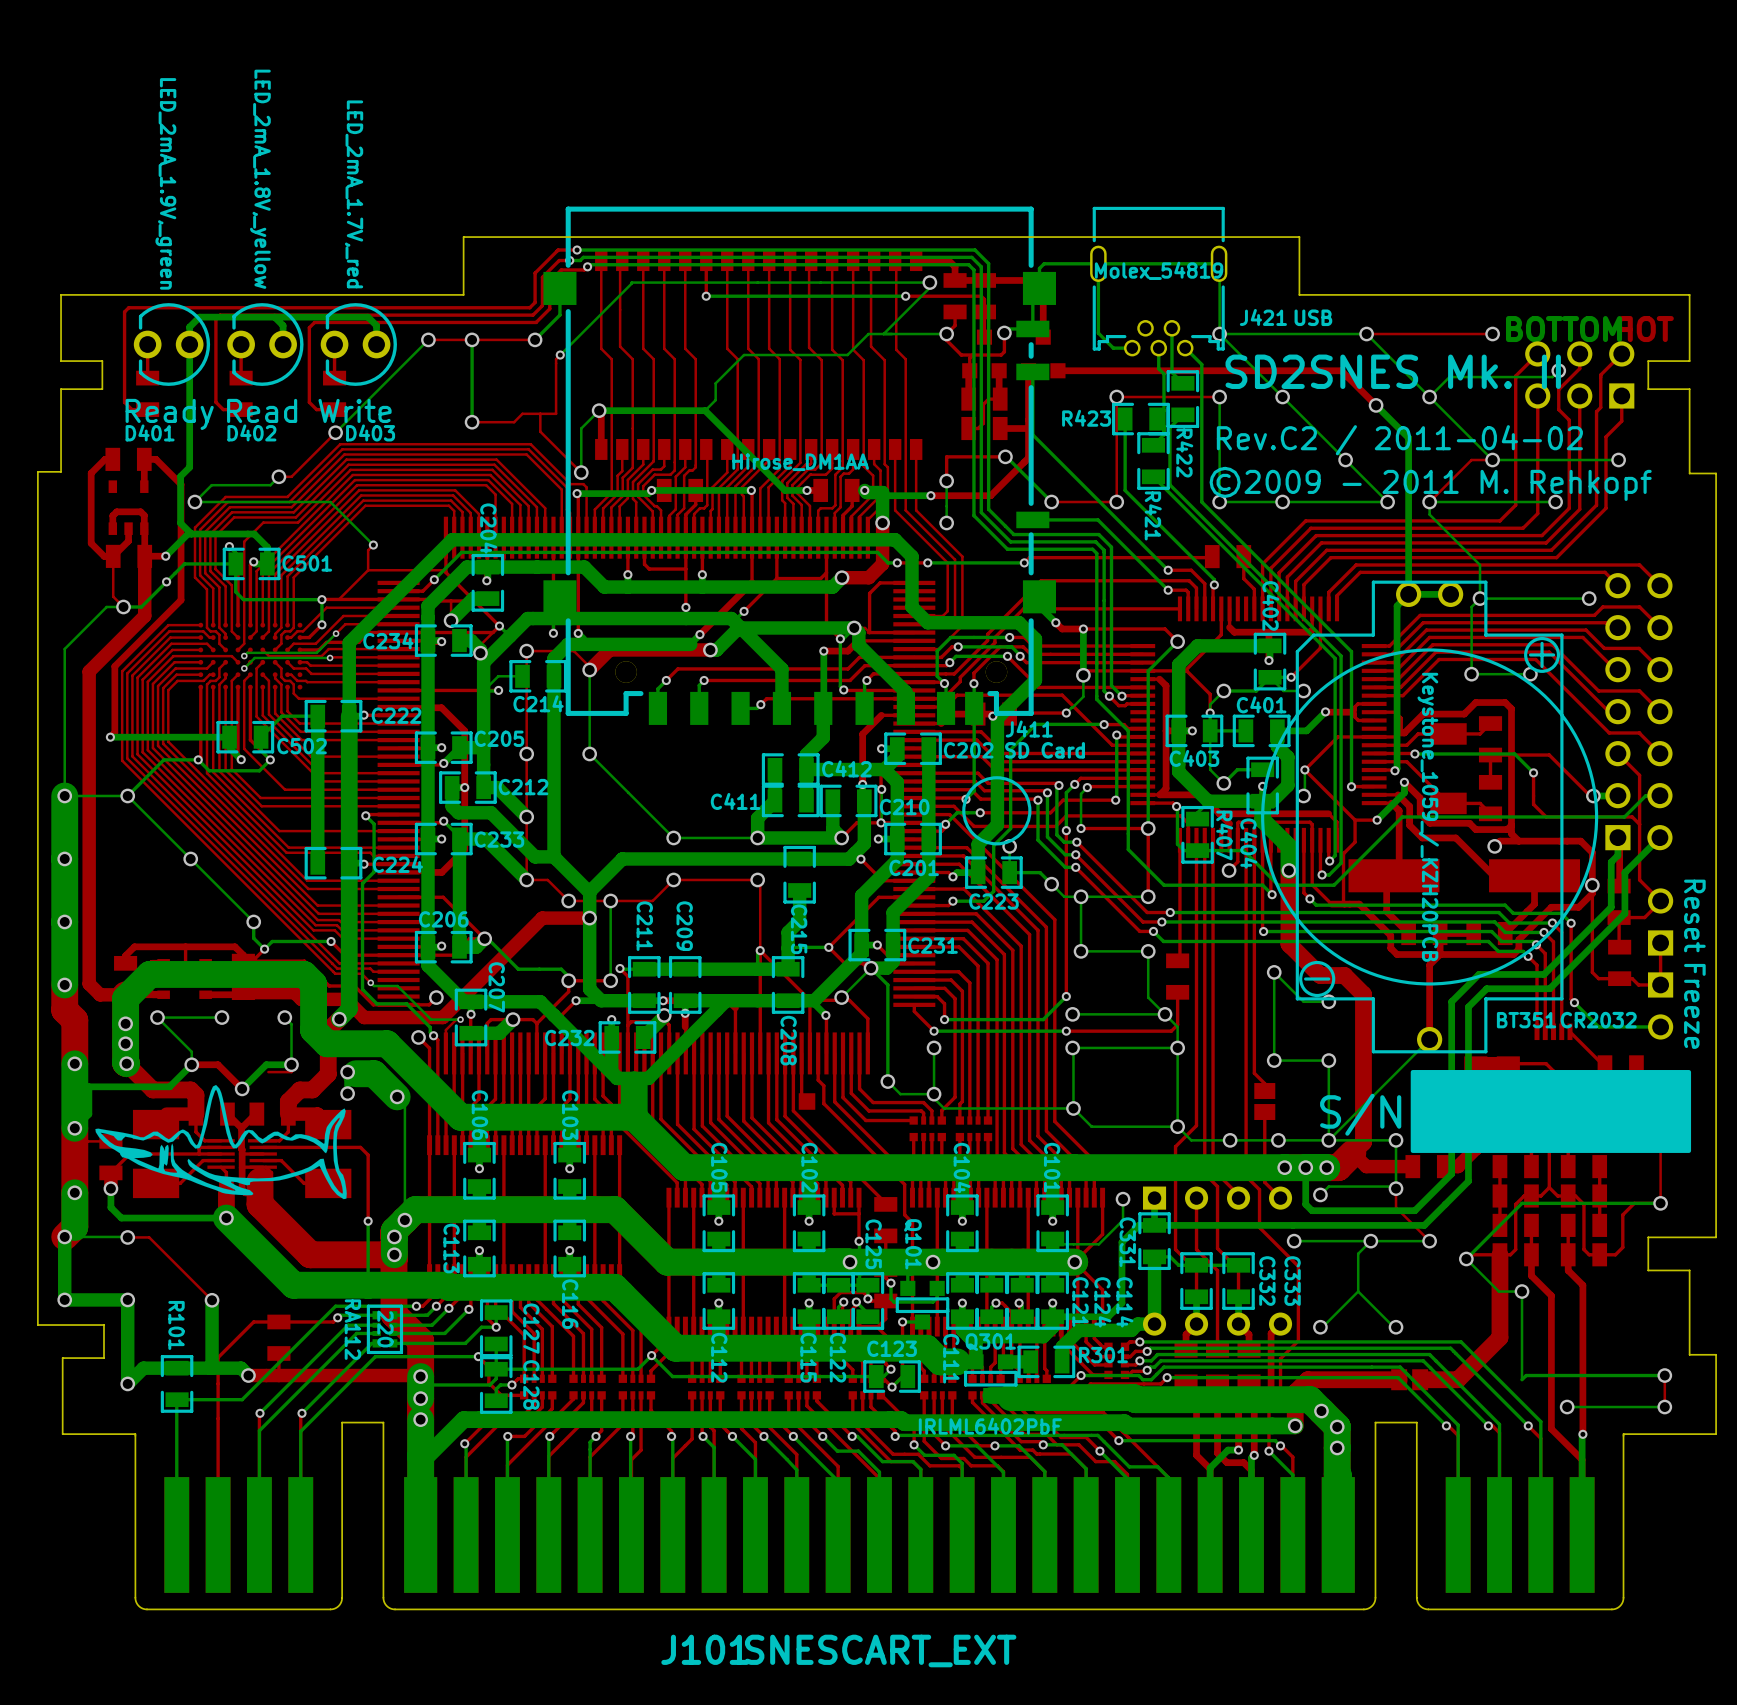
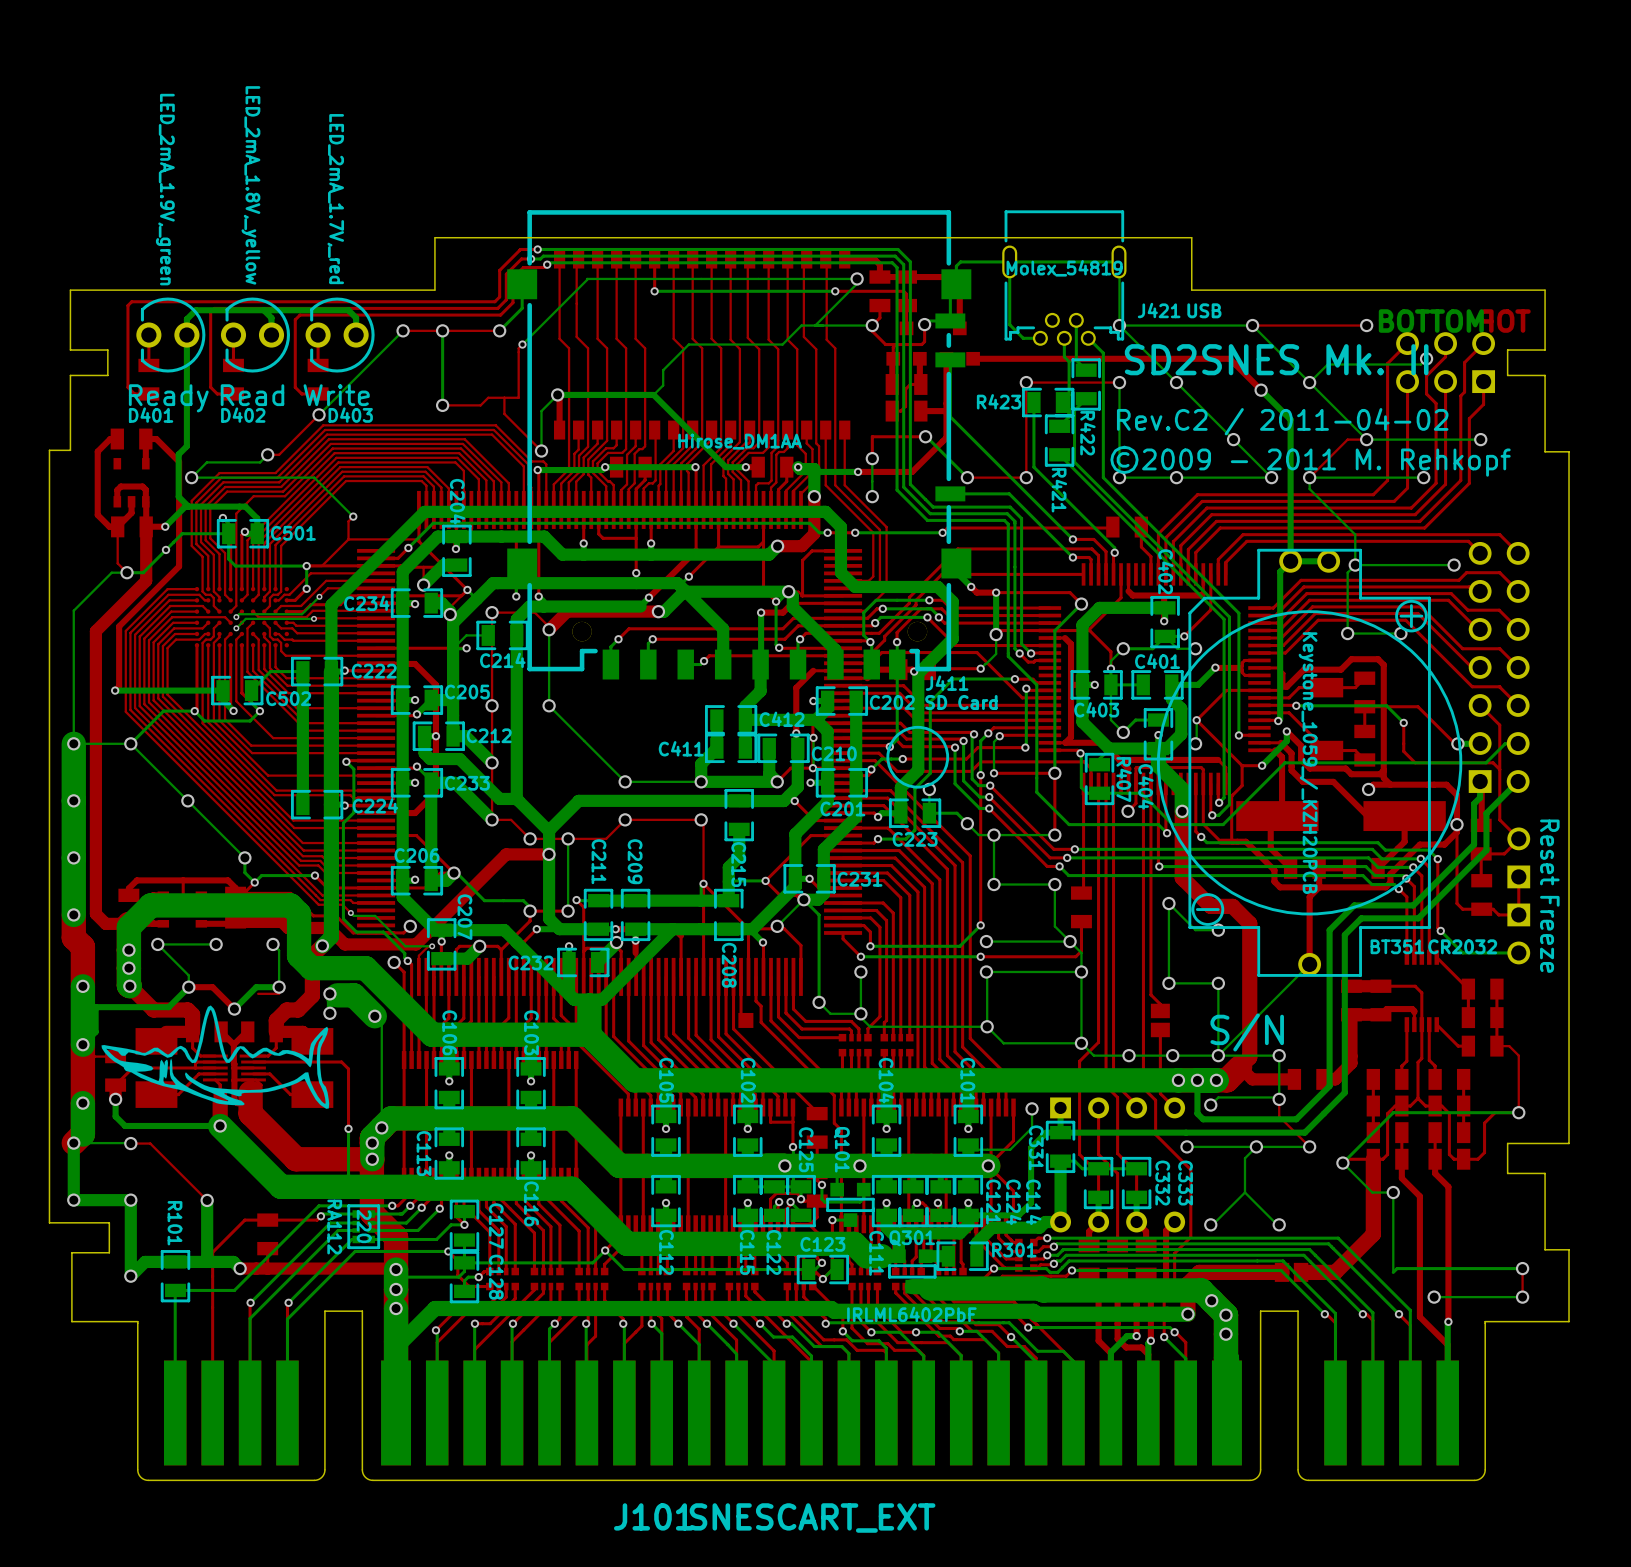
drawing: [1410, 1070, 1692, 1153] -> none

